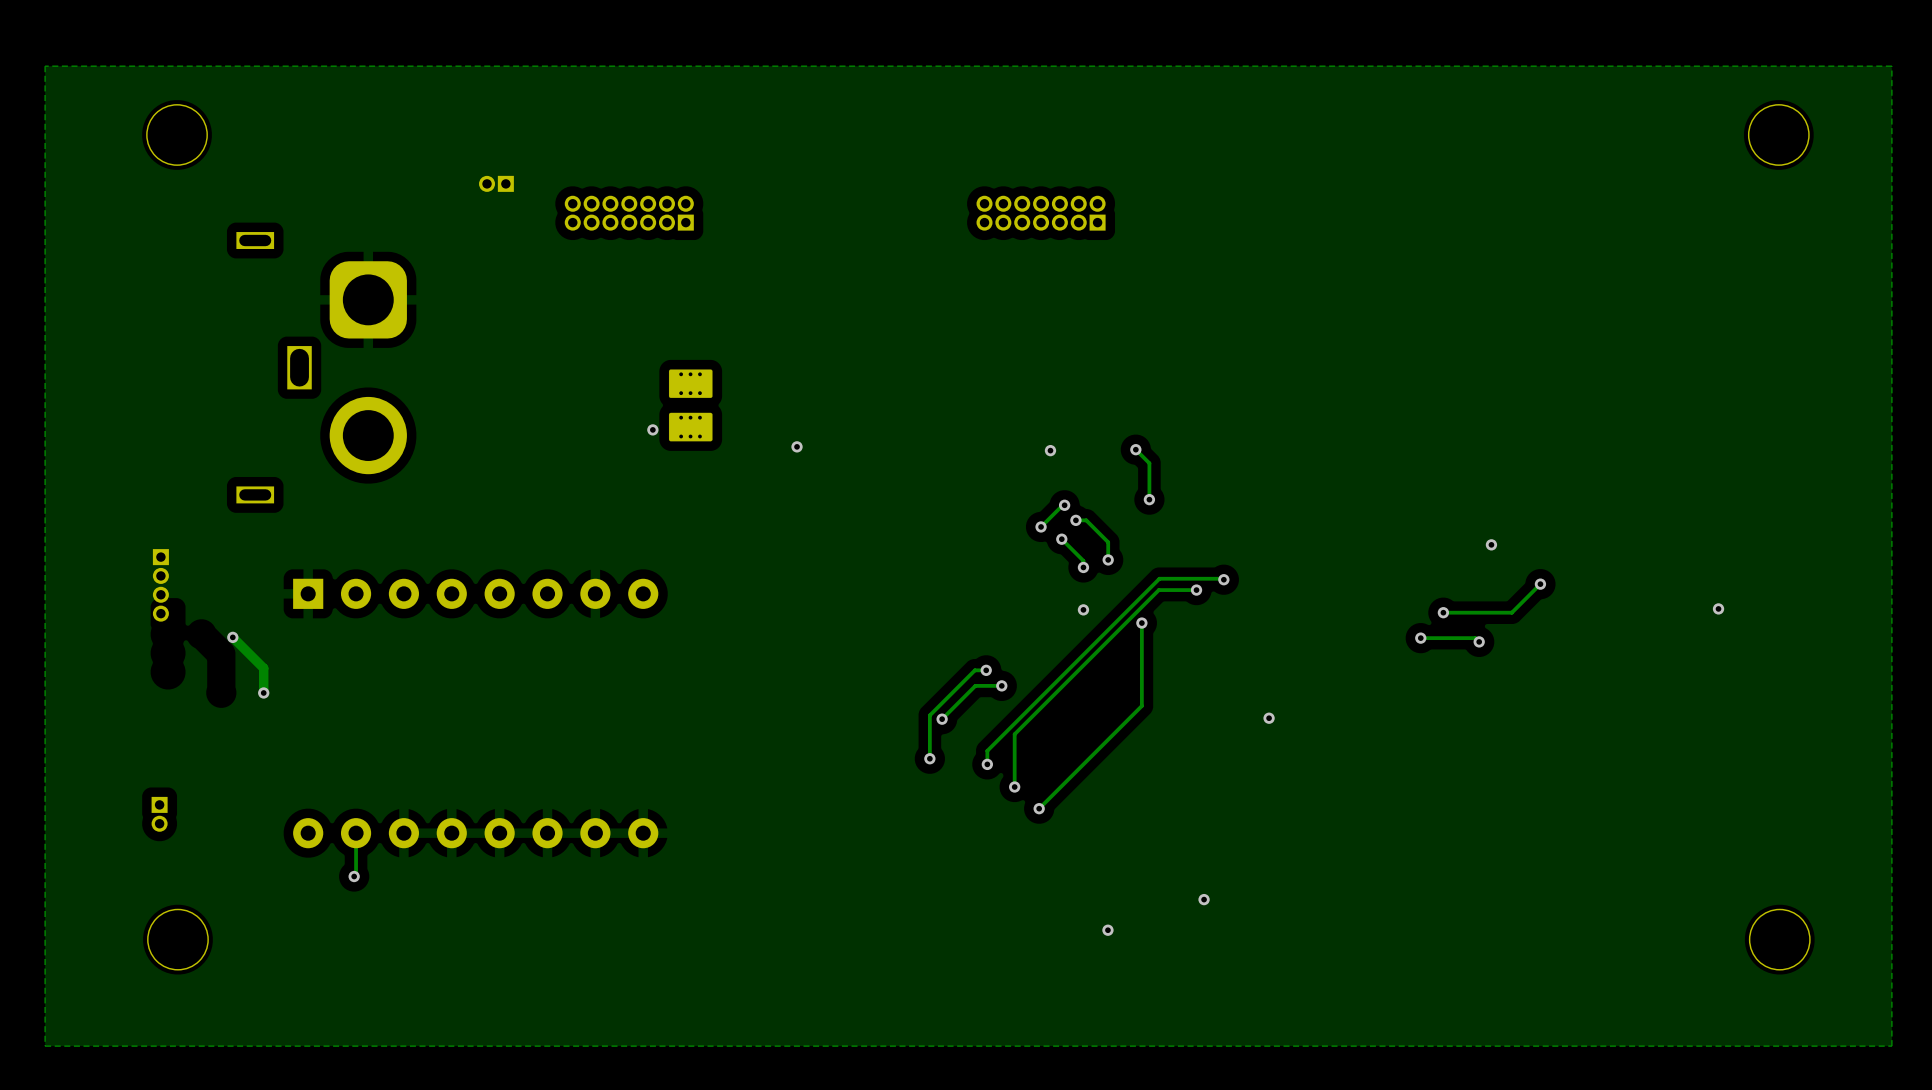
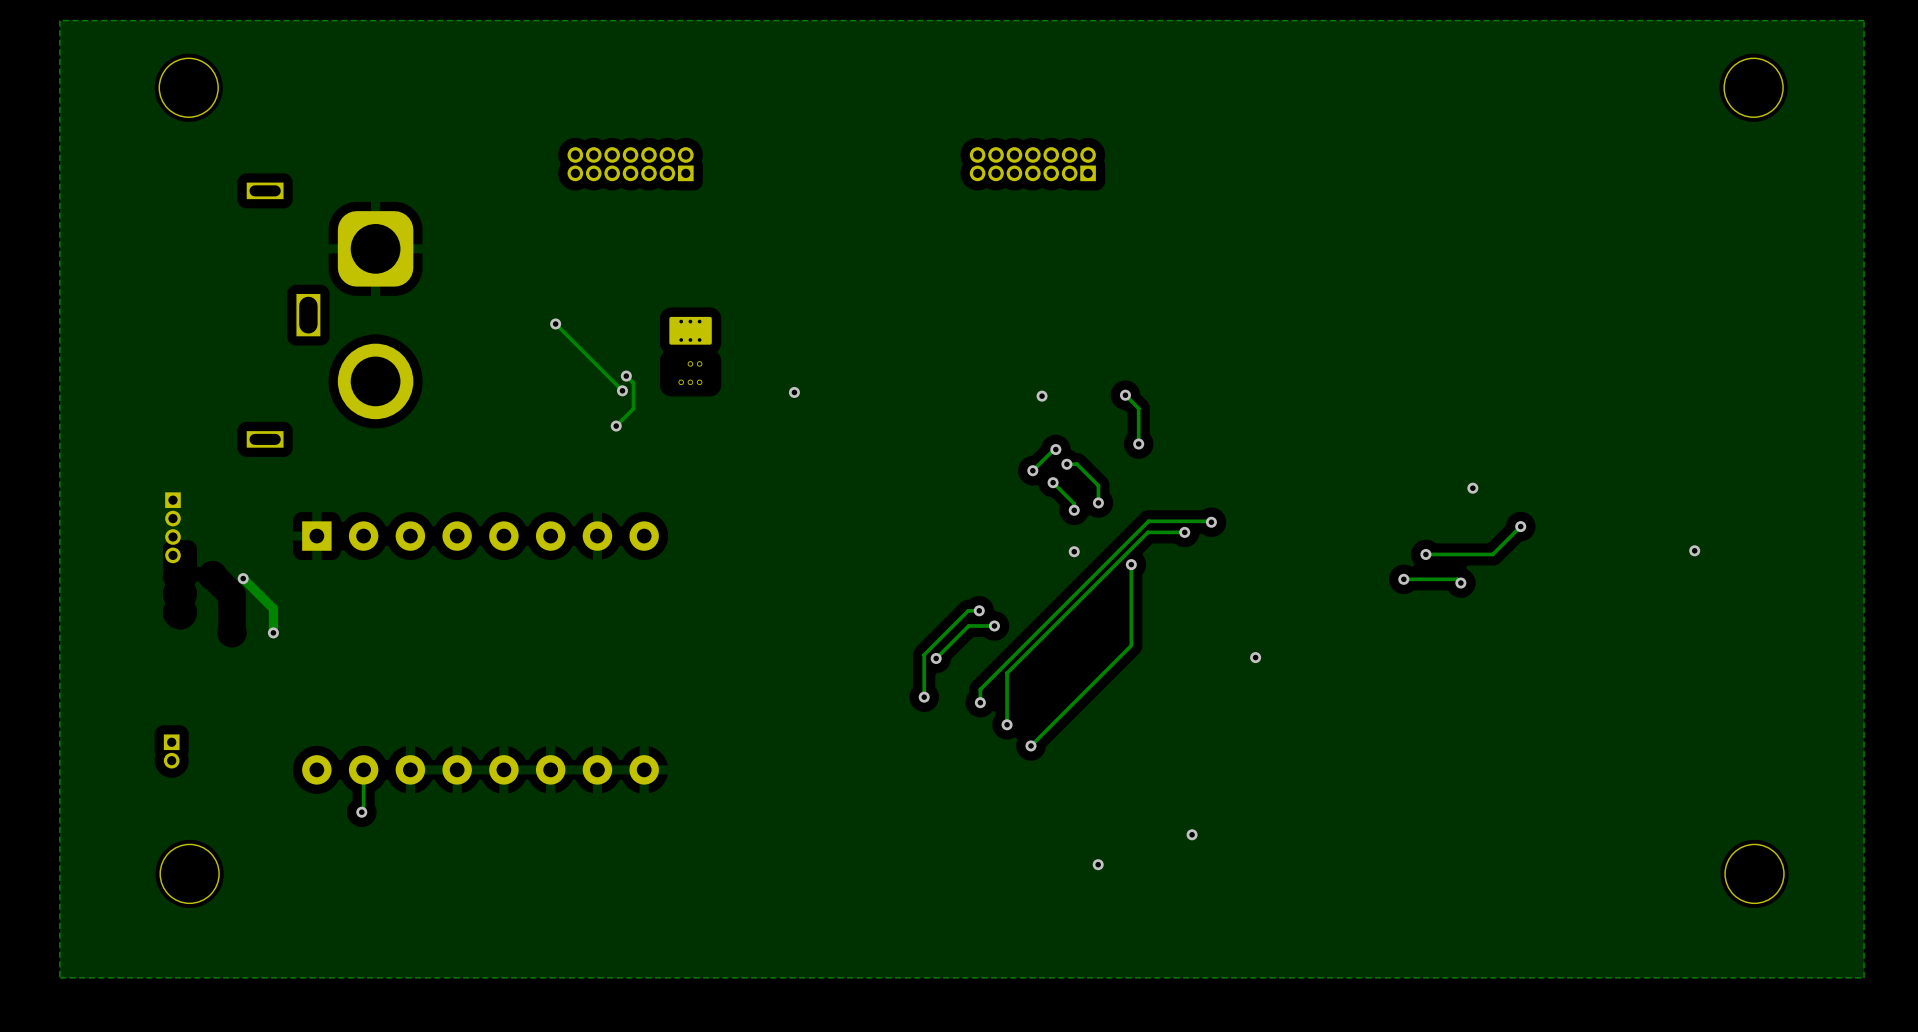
part: (496, 183) -> none
part footprint: [668, 369, 713, 442] -> [669, 316, 712, 386]
track: none -> (555, 323) (622, 390)
via: none -> (555, 323)
via: (652, 429) -> none
track: none -> (626, 376) (633, 383) (633, 408) (616, 426)
via: none -> (626, 376)
via: none -> (622, 390)
via: none -> (616, 426)

